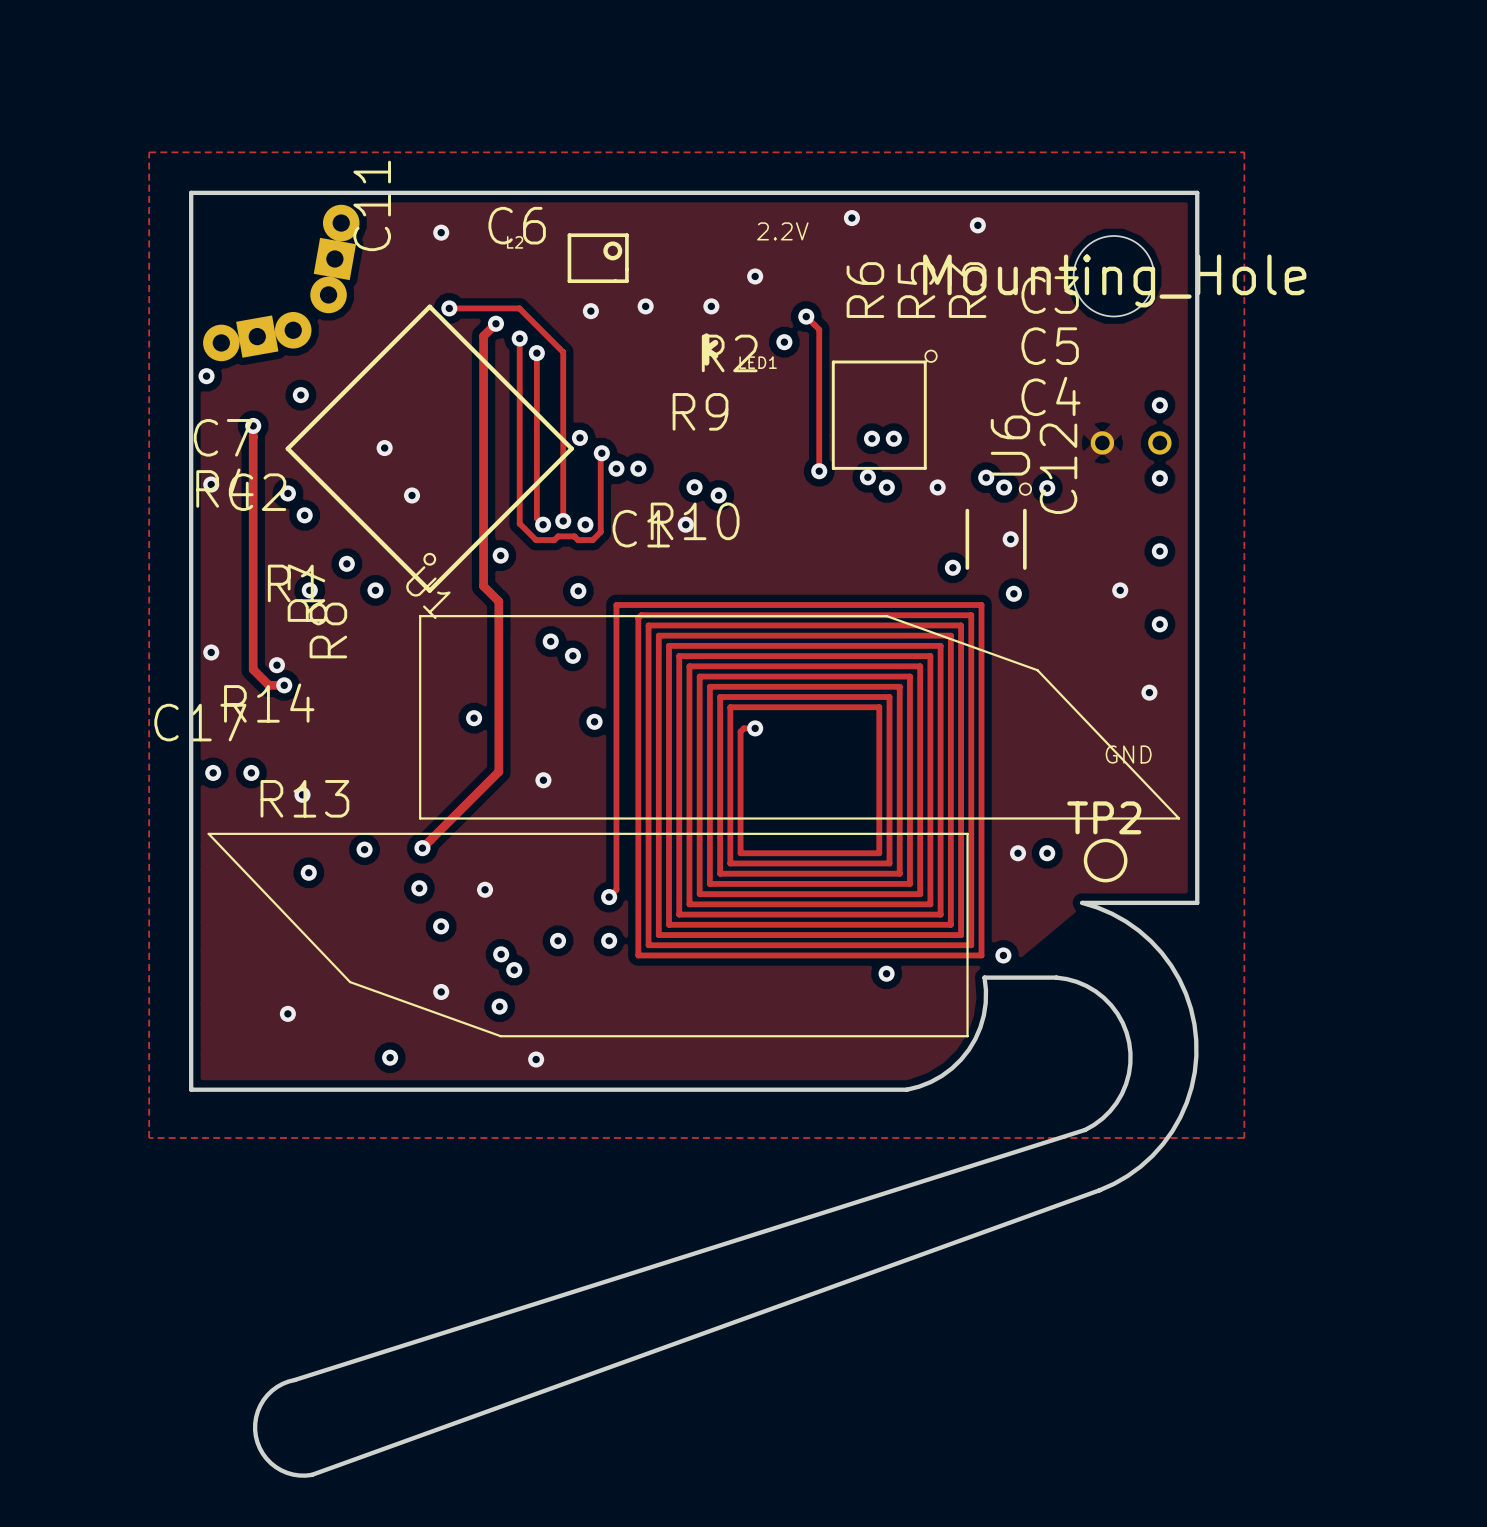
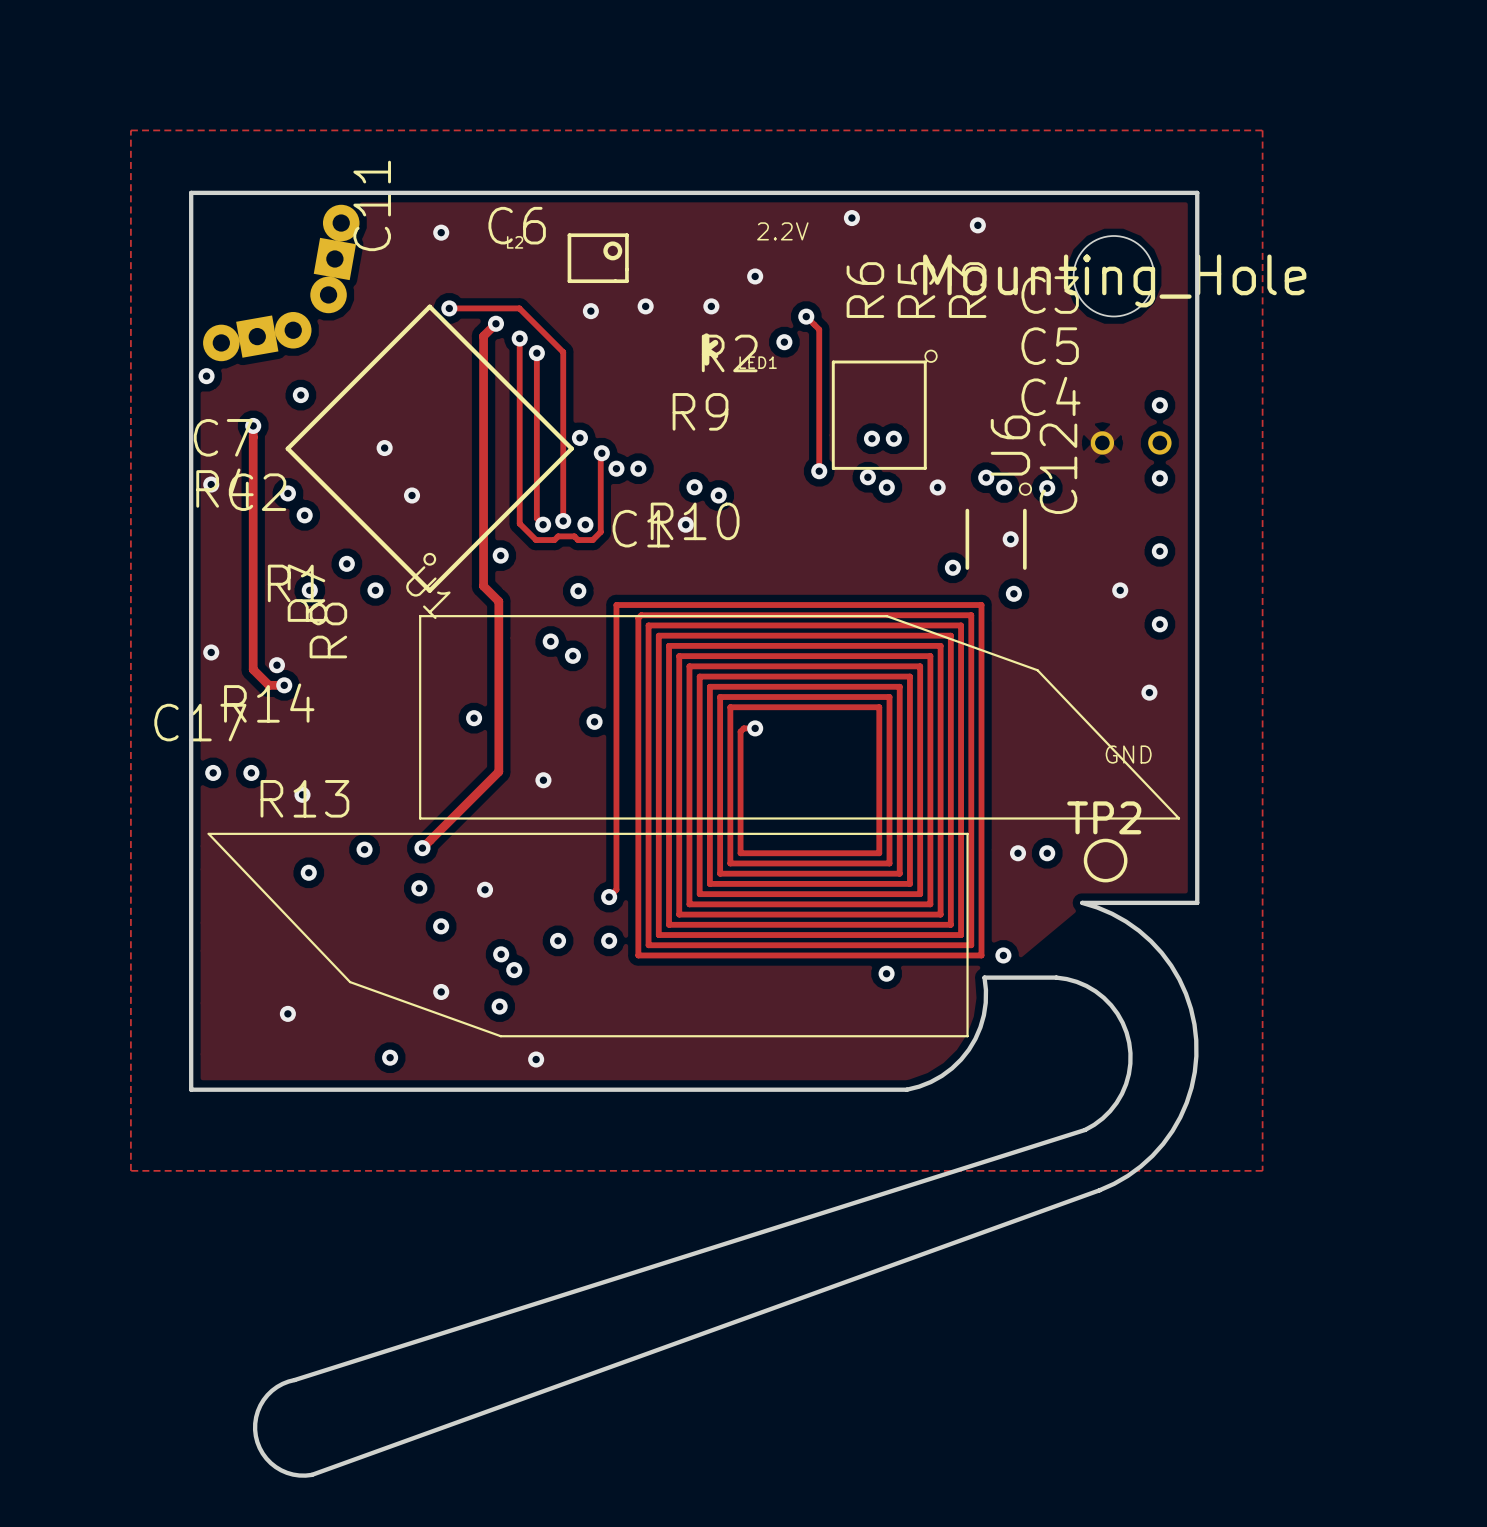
zone outline: (149, 152) (1244, 152) (1244, 1138) (149, 1138) (149, 152) -> (130, 130) (130, 1170) (1262, 1170) (1262, 130) (130, 130)

